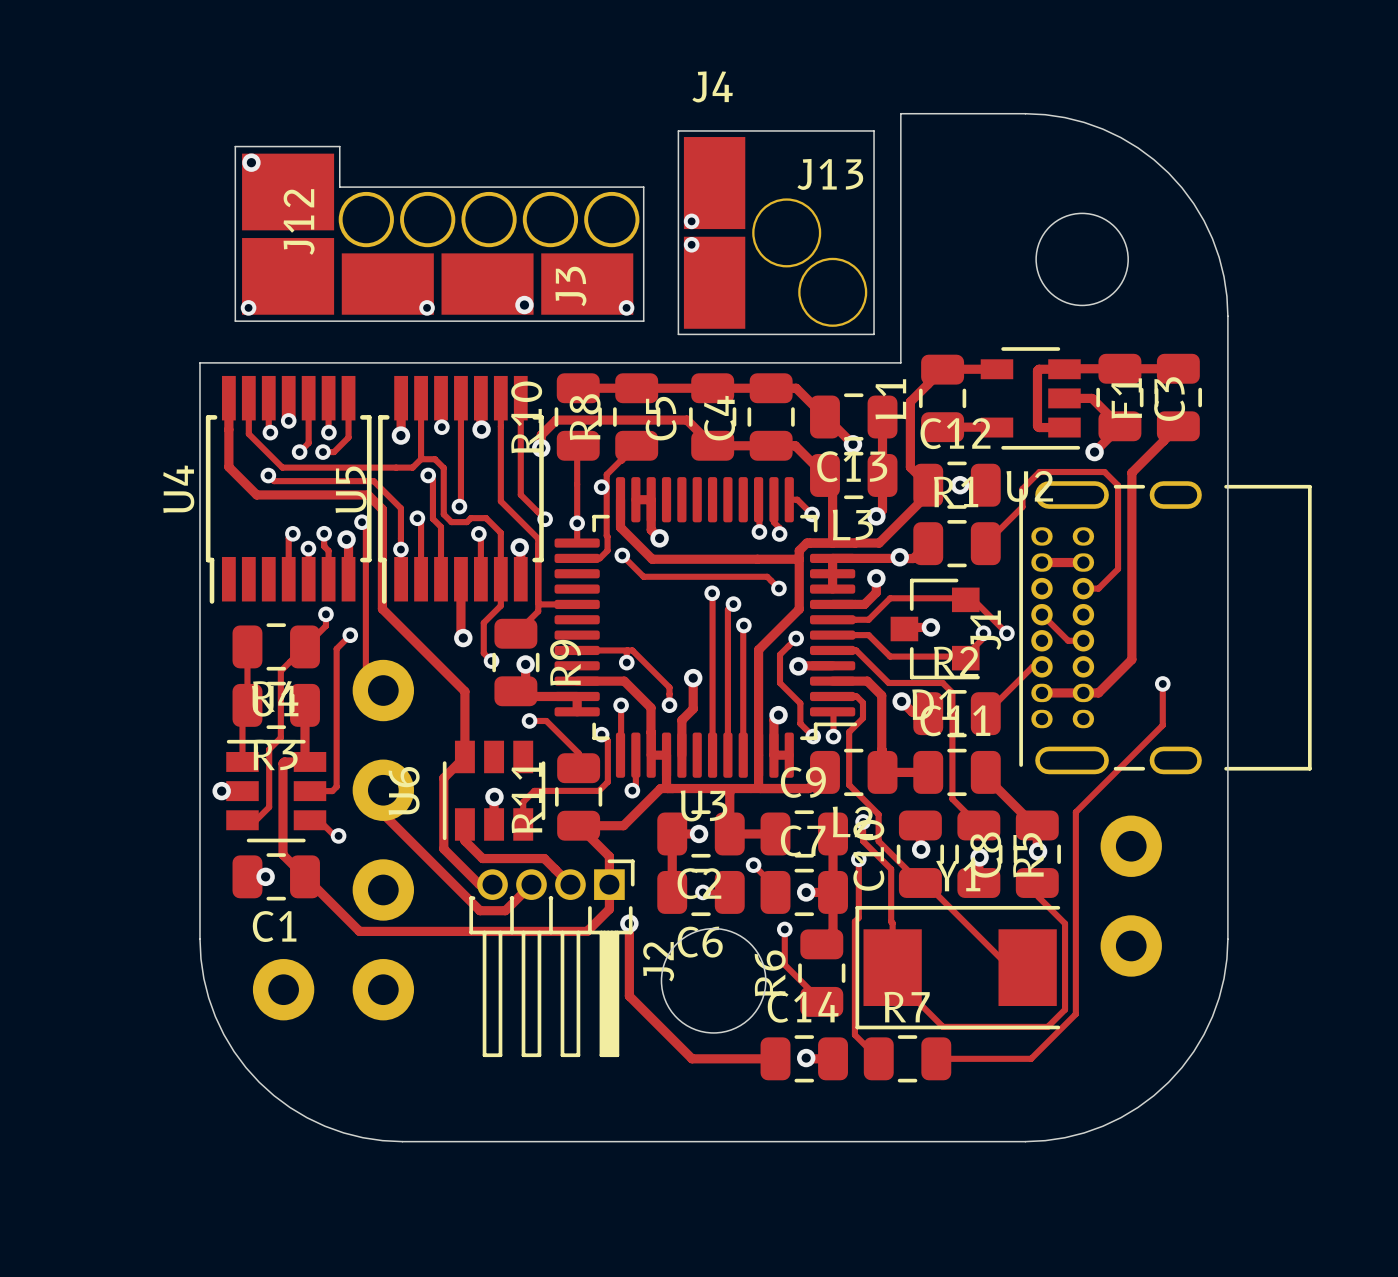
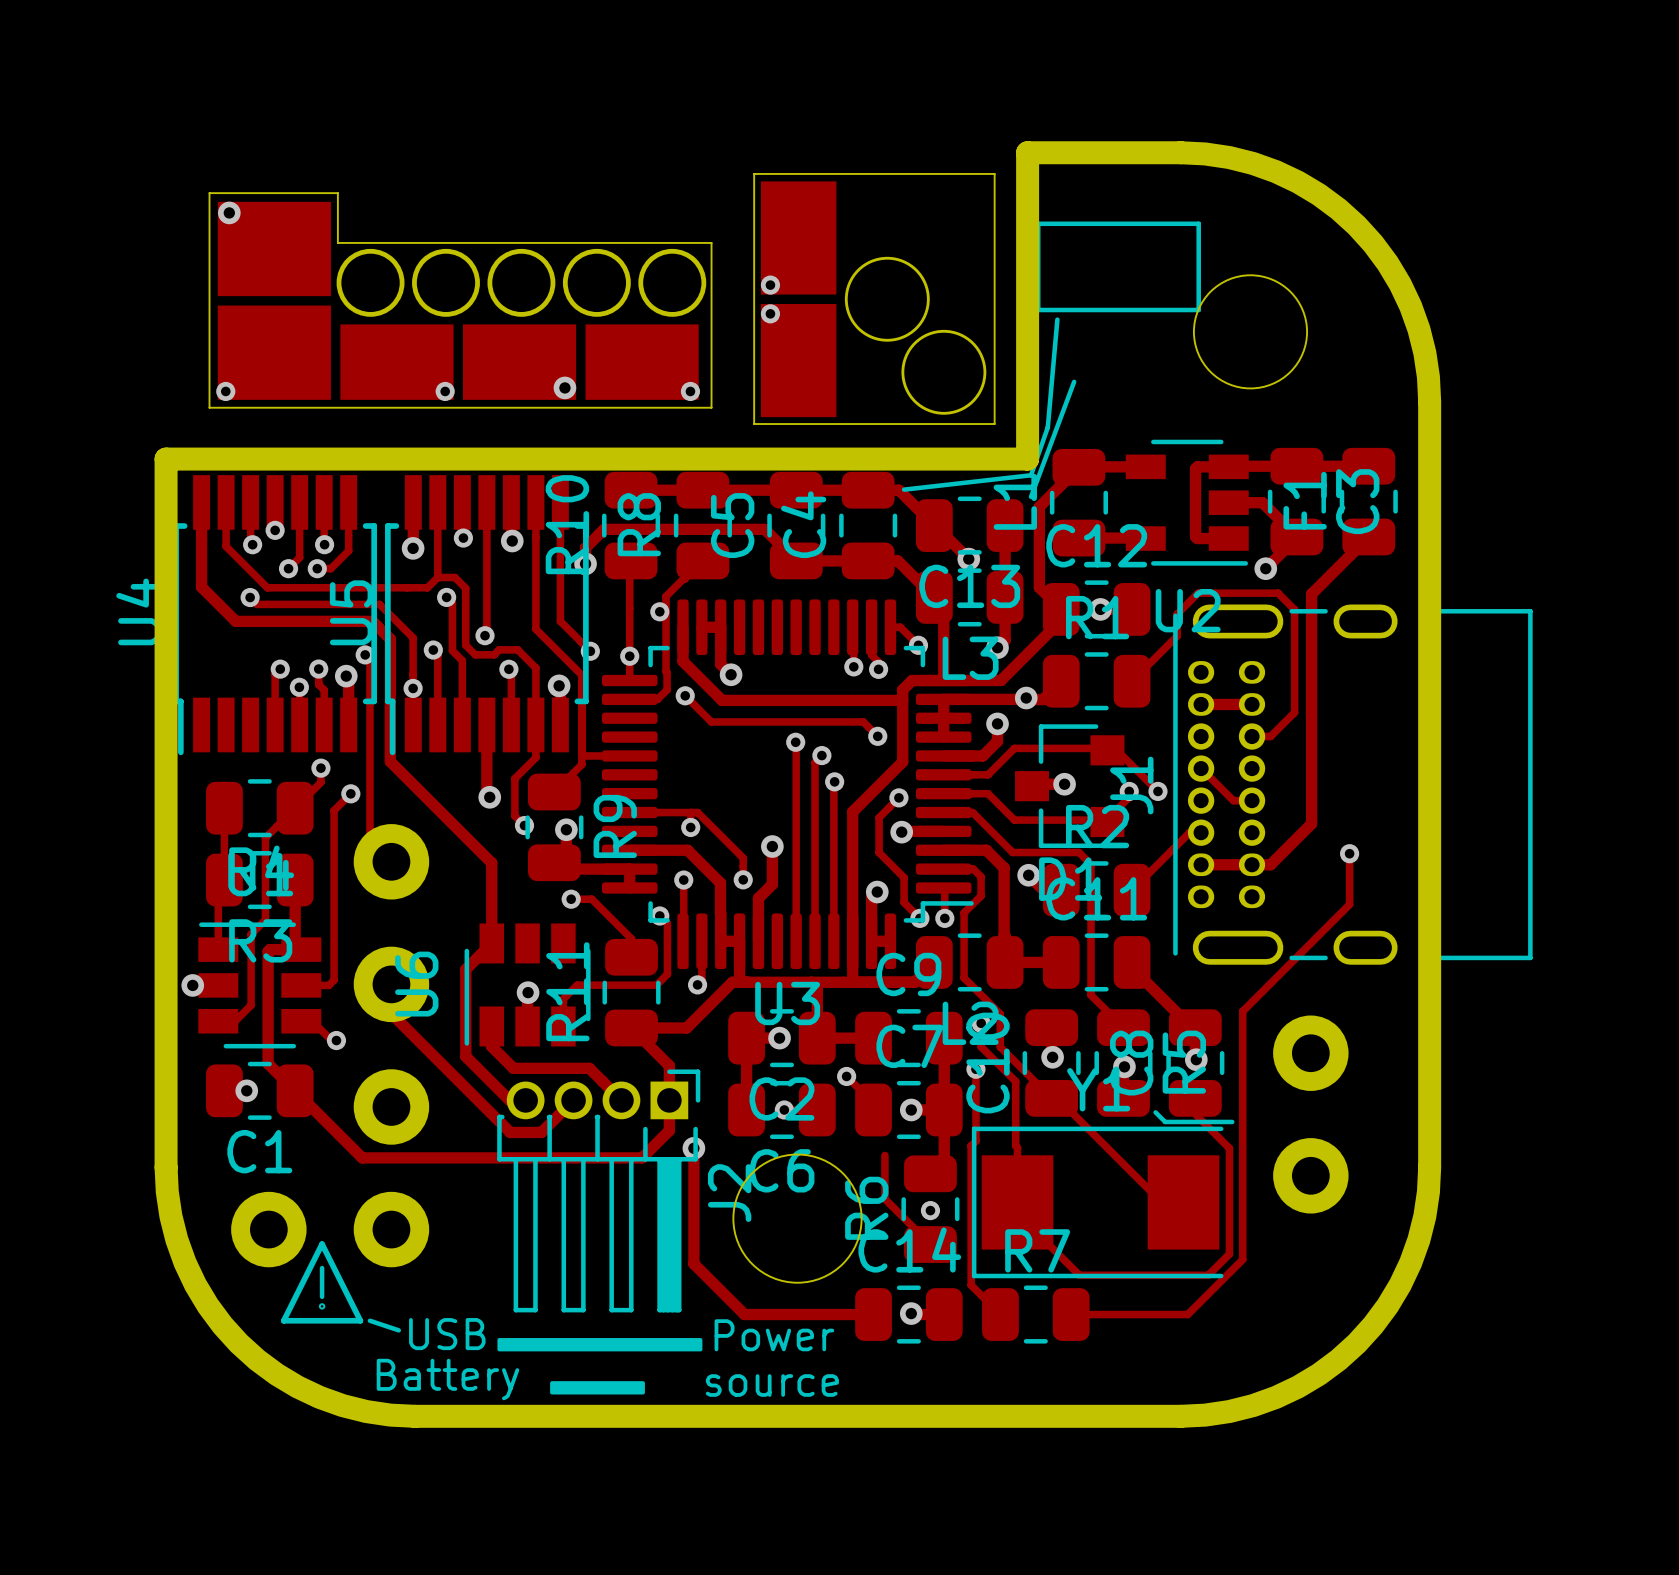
J4 name: J4 (712, 86) -> none
board edge width: thin (900, 113) (1045, 114) (1084, 122) (1102, 129) (1137, 147) (1153, 159) (1181, 187) (1204, 220) (1219, 257) (1226, 296) (1227, 316) (1227, 939) (1226, 959) (1219, 997) (1212, 1016) (1193, 1051) (1168, 1082) (1137, 1107) (1102, 1126) (1084, 1132) (1045, 1140) (402, 1141) (362, 1137) (343, 1132) (324, 1126) (289, 1107) (259, 1082) (234, 1051) (223, 1034) (208, 997) (200, 959) (199, 362) (900, 362) (900, 113) -> thick (1027, 152) (1205, 153) (1253, 163) (1276, 171) (1319, 194) (1338, 209) (1373, 243) (1400, 284) (1418, 329) (1428, 377) (1429, 401) (1429, 1167) (1428, 1191) (1418, 1239) (1410, 1262) (1387, 1305) (1356, 1343) (1319, 1374) (1276, 1397) (1253, 1405) (1205, 1415) (414, 1416) (366, 1411) (342, 1405) (319, 1397) (276, 1374) (238, 1343) (208, 1305) (195, 1284) (176, 1239) (167, 1191) (166, 459) (1027, 459) (1027, 152)
line: none -> (1038, 223) (1038, 310) (1198, 310) (1198, 223) (1038, 223)
J13 name: J13 (830, 174) -> none
J12 name: J12 (299, 222) -> none
line: none -> (1057, 319) (1047, 427) (1031, 475) (904, 489)
J3 name: J3 (570, 286) -> none
line: none -> (1074, 381) (1031, 496)
line: none -> (1155, 1112) (1165, 1121) (1232, 1121)
via position: (784, 929) -> (930, 1210)
track: (629, 996) (692, 1058) -> (693, 1237) (693, 1263) (744, 1314) (770, 1314)
line: none -> (322, 1244) (360, 1320) (283, 1320) (322, 1244)
line: none -> (322, 1268) (322, 1296)
drawing: none -> [318, 1303, 326, 1310]
line: none -> (369, 1320) (398, 1330)
text: none -> USB (447, 1334)
text: none -> Power (774, 1335)
drawing: none -> [497, 1338, 703, 1395]
text: none -> Battery (447, 1379)
text: none -> source (772, 1385)

